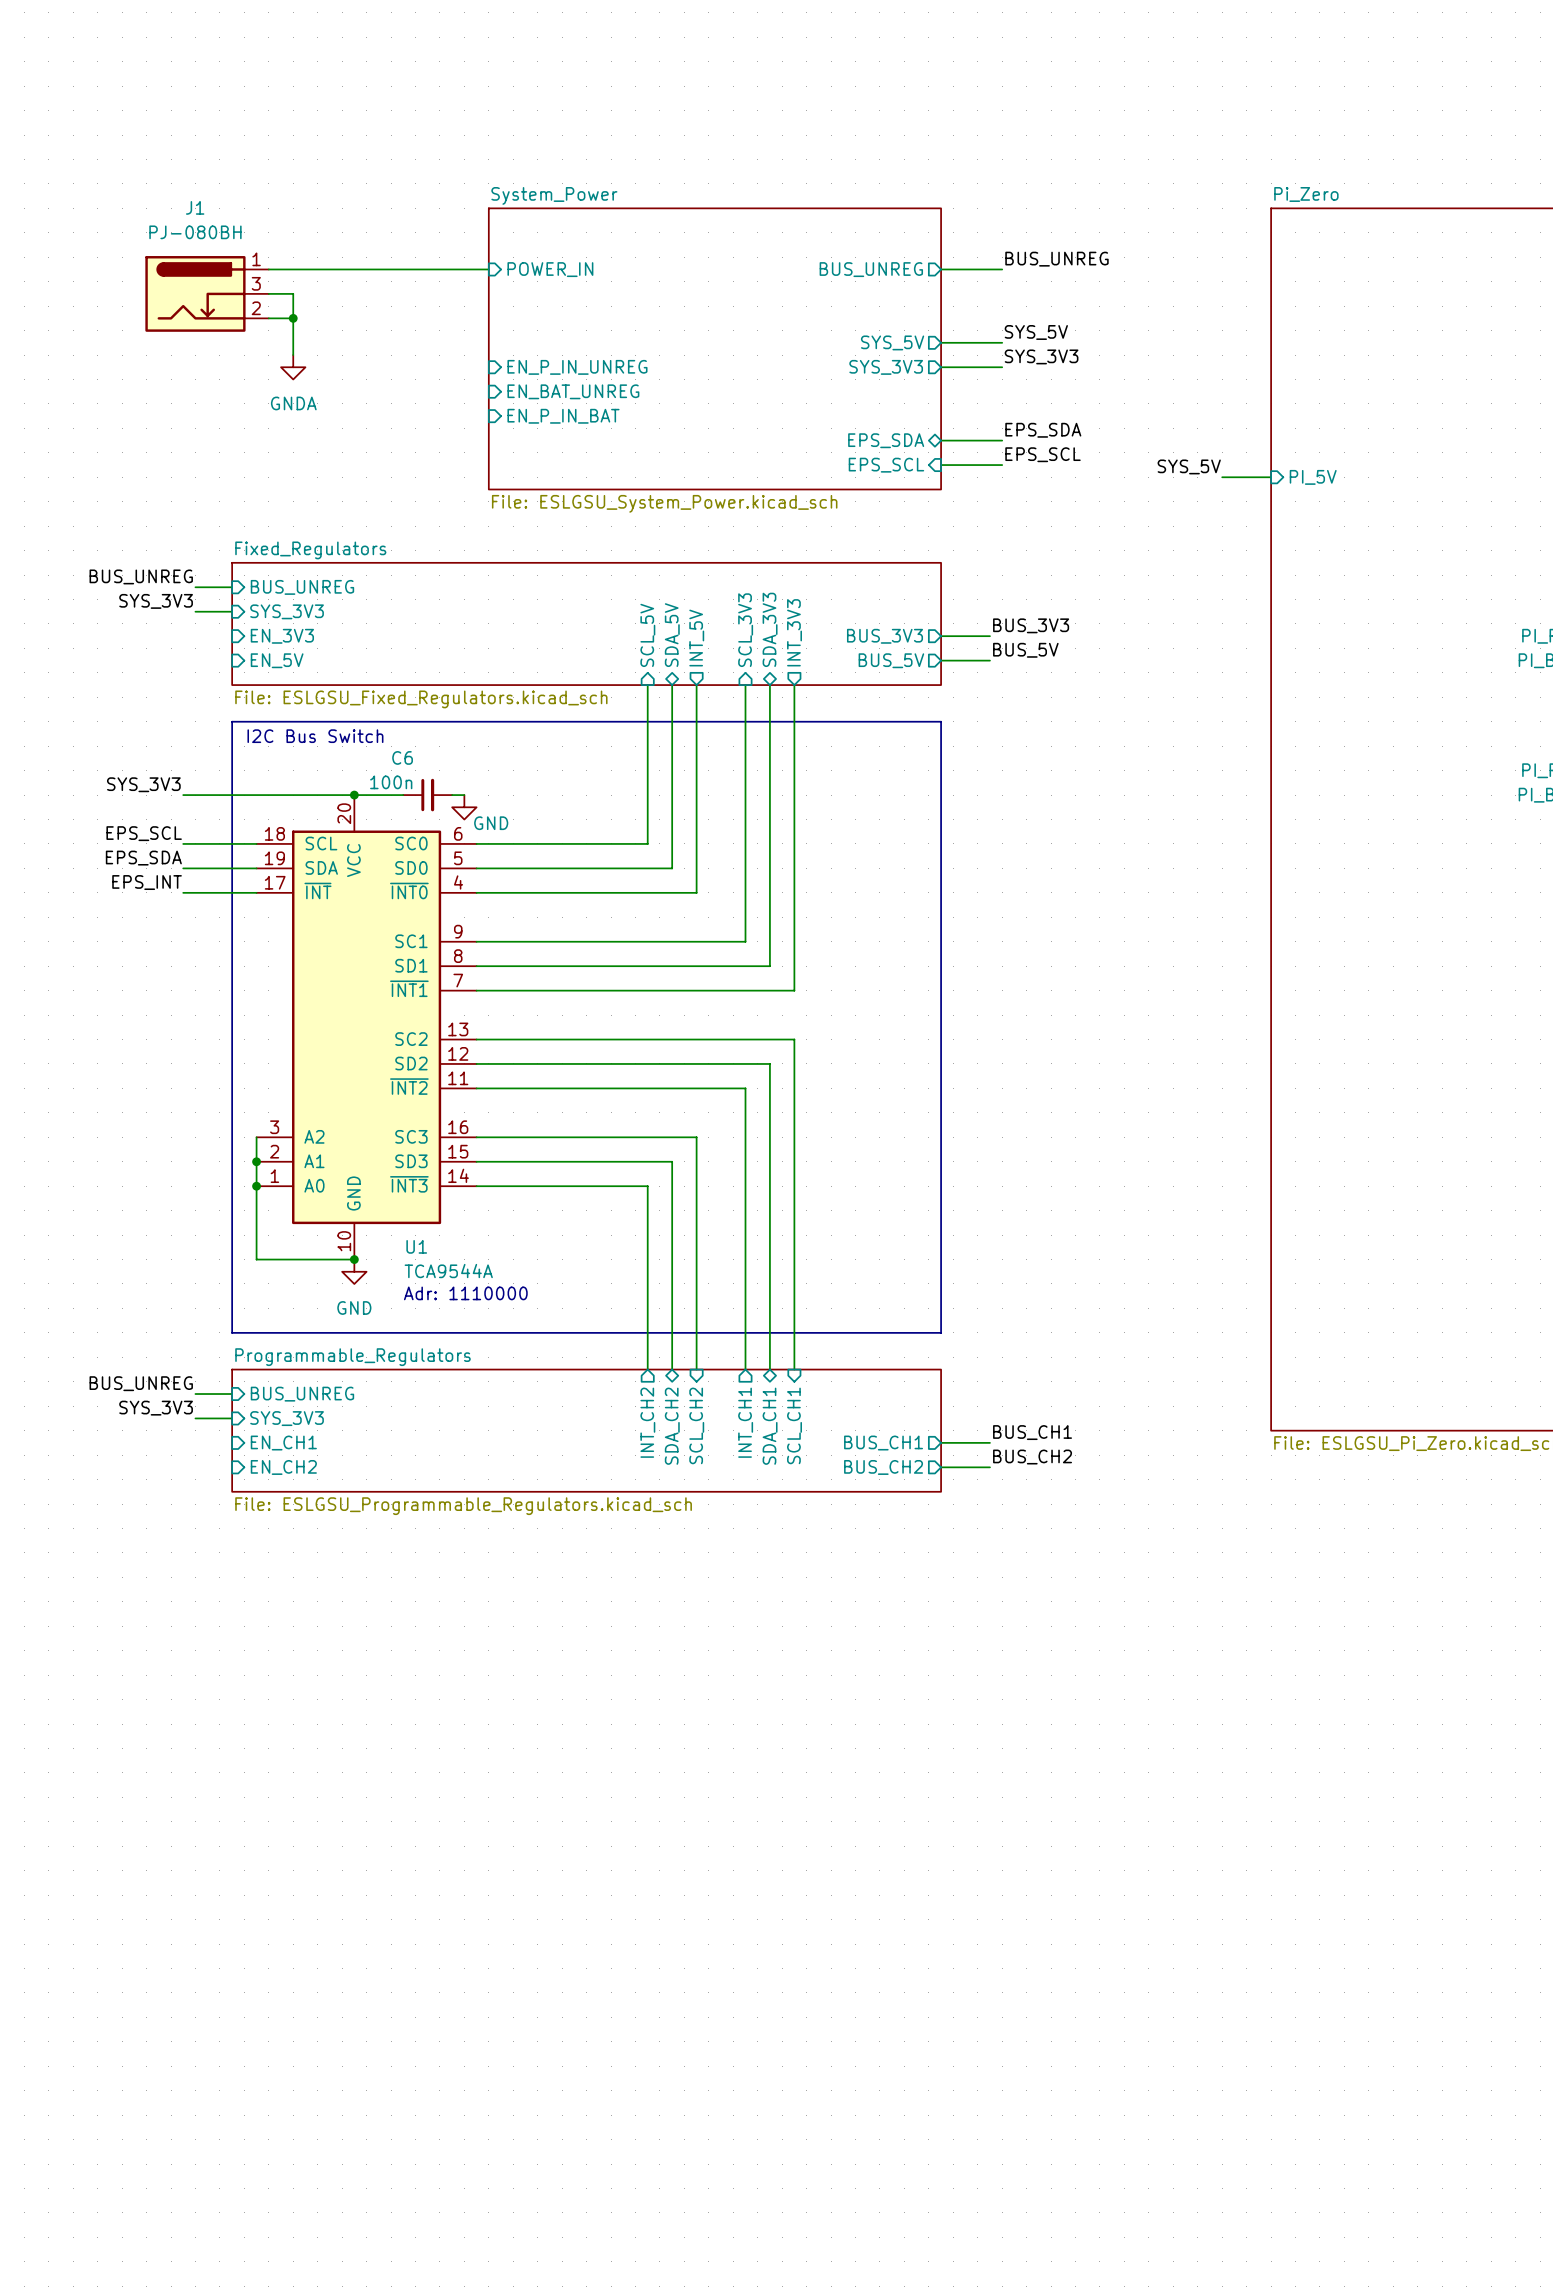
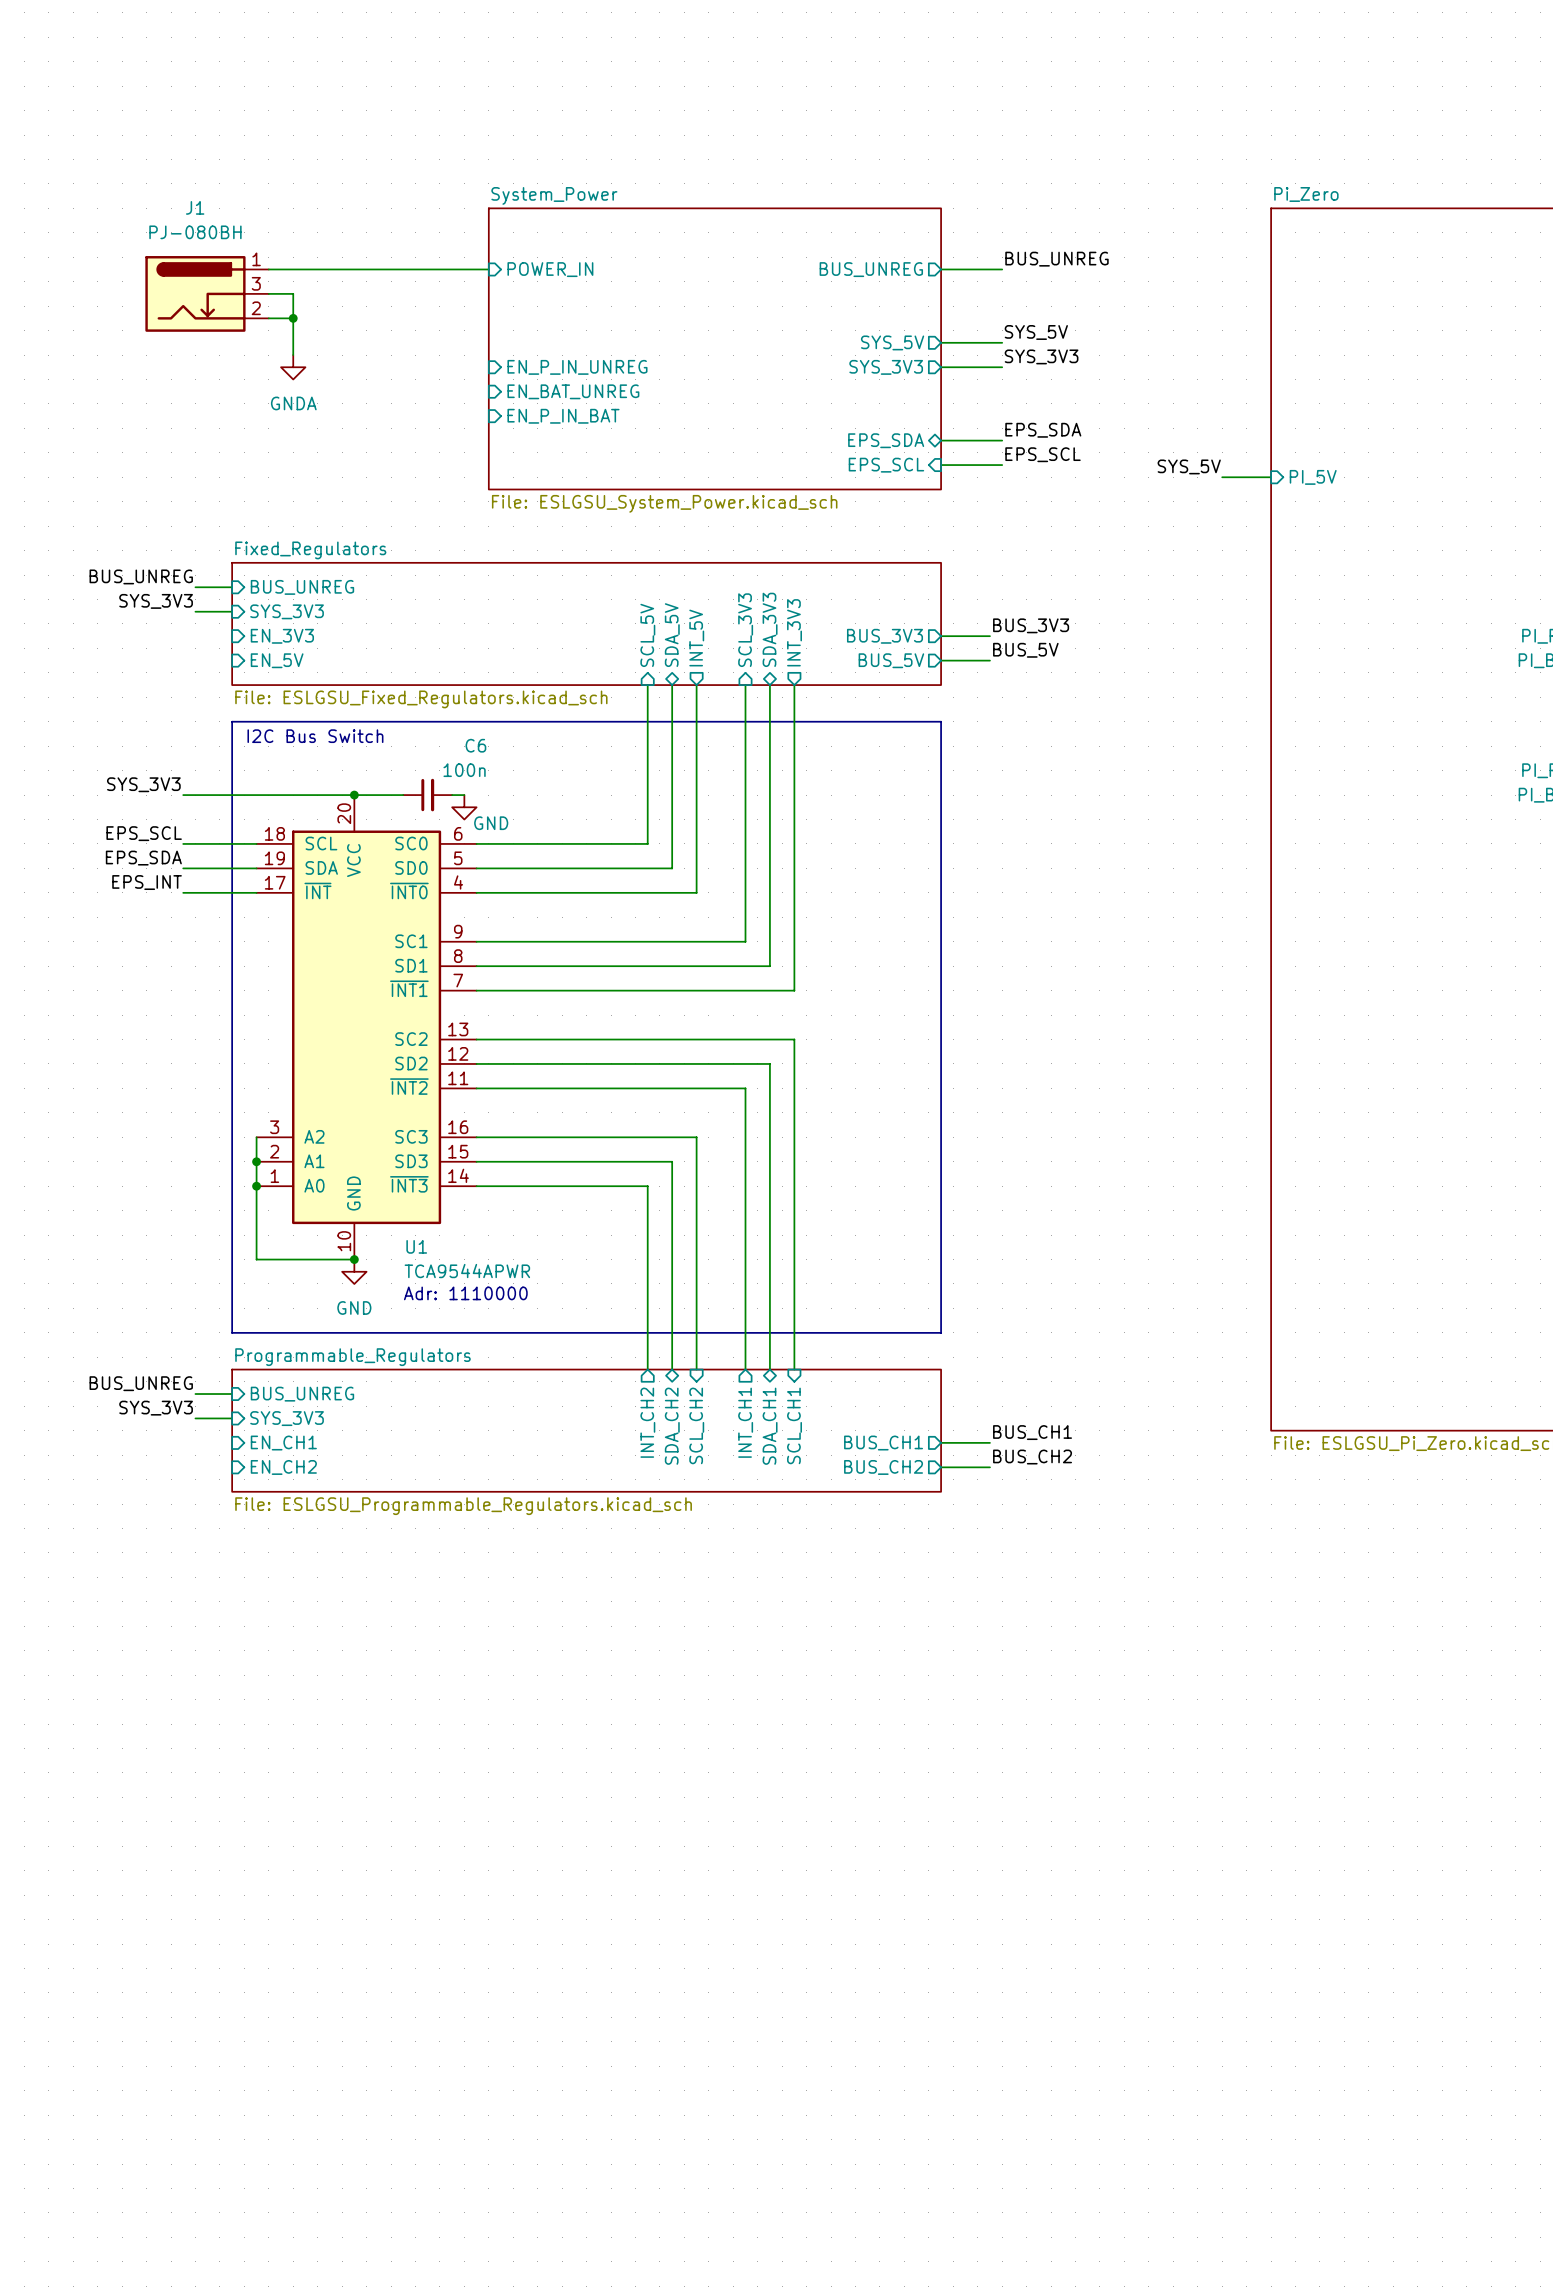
C6 name position: C6 (402, 757) -> C6 (475, 745)
C6 value position: 100n (391, 782) -> 100n (464, 770)
U1 value: TCA9544A (448, 1271) -> TCA9544APWR (467, 1271)

